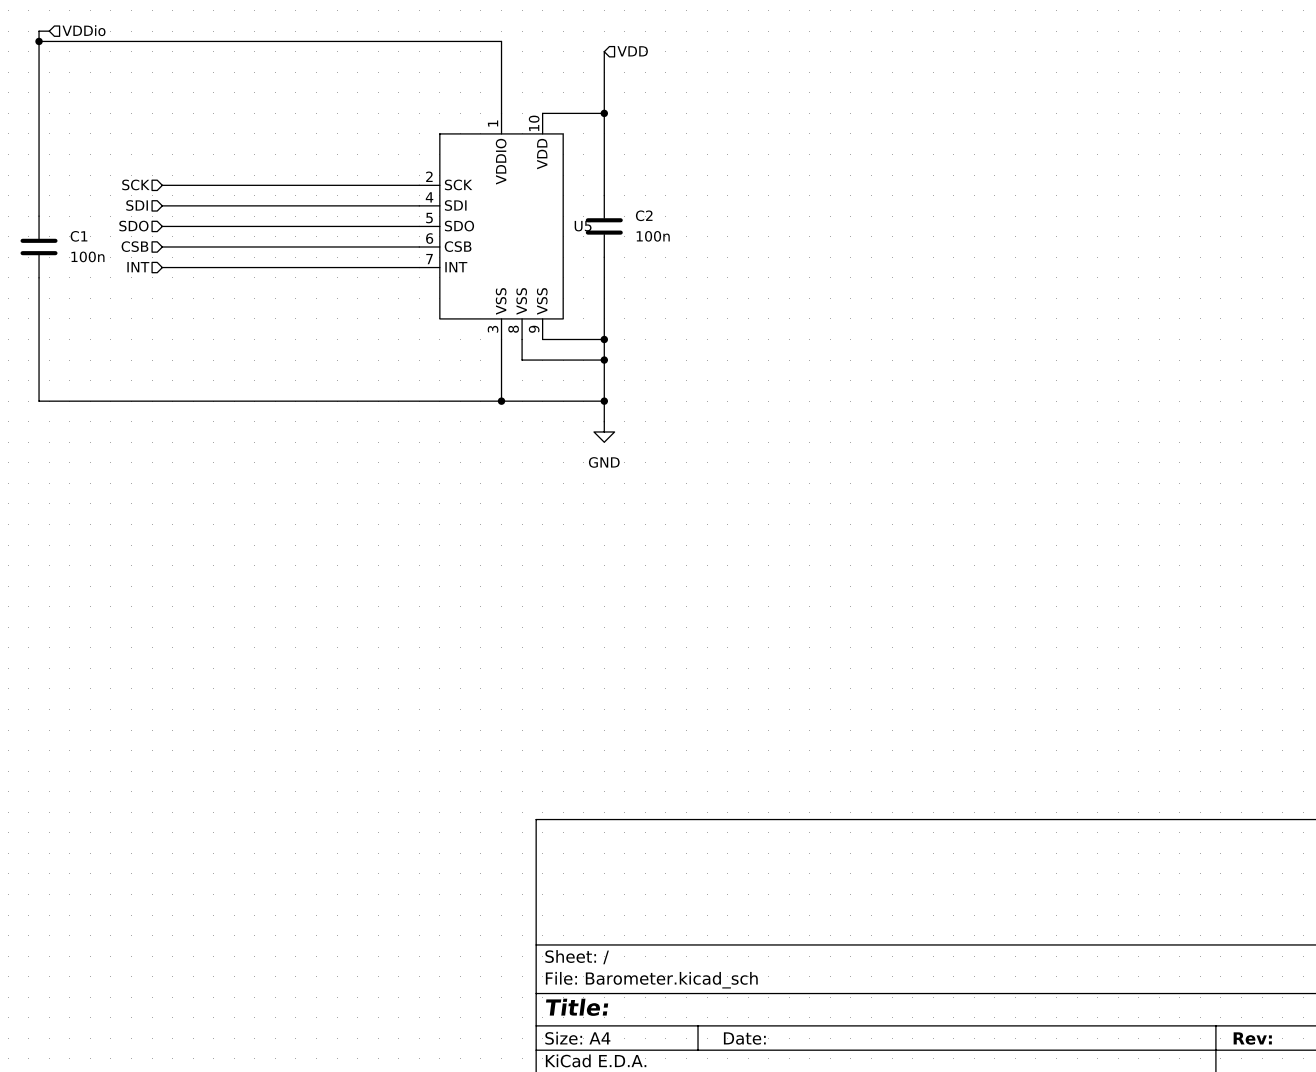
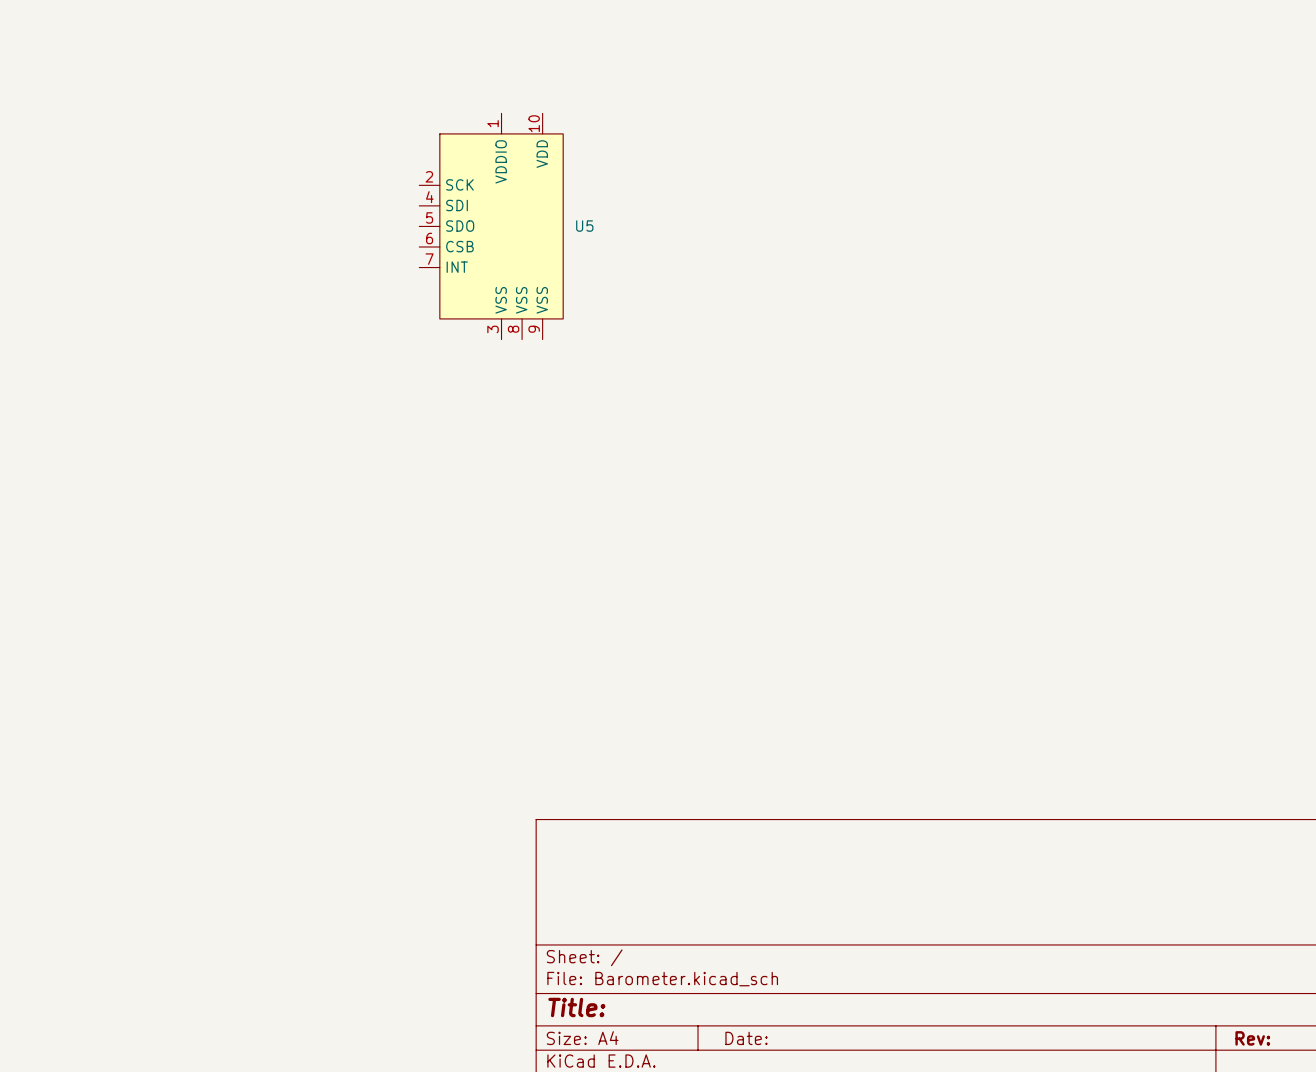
hierarchical label: VDDio (83, 30) -> none
wire: (49, 31) (39, 31) (39, 216) -> none
wire: (39, 41) (501, 41) (501, 113) -> none
junction: (39, 41) -> none
wire: (604, 51) (604, 195) -> none
hierarchical label: VDD (632, 51) -> none
wire: (542, 113) (604, 113) -> none
junction: (604, 113) -> none
hierarchical label: SCK (135, 184) -> none
wire: (162, 185) (419, 185) -> none
hierarchical label: SDI (137, 205) -> none
wire: (162, 205) (419, 205) -> none
hierarchical label: SDO (133, 226) -> none
wire: (162, 226) (419, 226) -> none
C2: 100n (604, 226) -> none
C1: 100n (39, 246) -> none
hierarchical label: CSB (134, 246) -> none
wire: (162, 246) (419, 246) -> none
wire: (604, 257) (604, 421) -> none
hierarchical label: INT (138, 267) -> none
wire: (162, 267) (419, 267) -> none
wire: (39, 277) (39, 401) (604, 401) -> none
wire: (501, 339) (501, 401) -> none
wire: (522, 339) (522, 360) (604, 360) -> none
wire: (542, 339) (604, 339) -> none
junction: (604, 339) -> none
junction: (604, 360) -> none
junction: (501, 401) -> none
junction: (604, 401) -> none
power symbol: GND (604, 431) -> none

